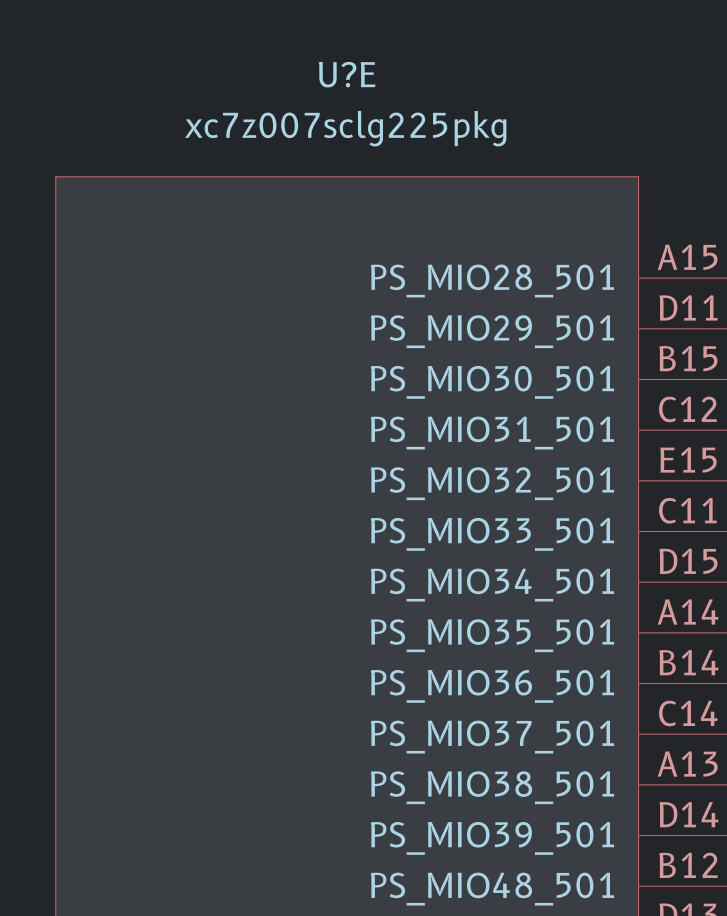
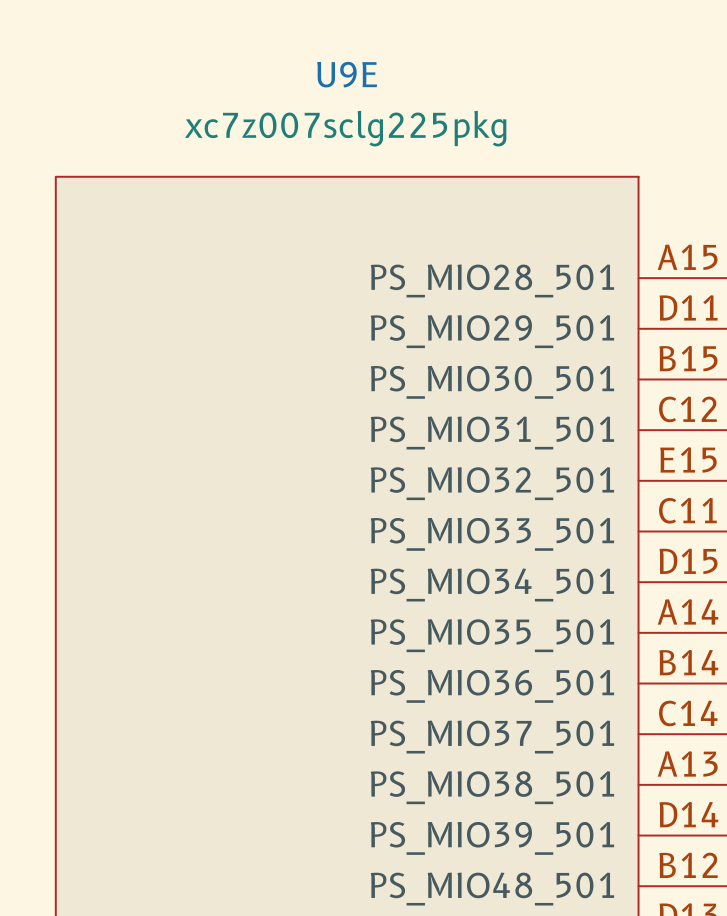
U?E name: U?E (347, 74) -> U9E (347, 74)

